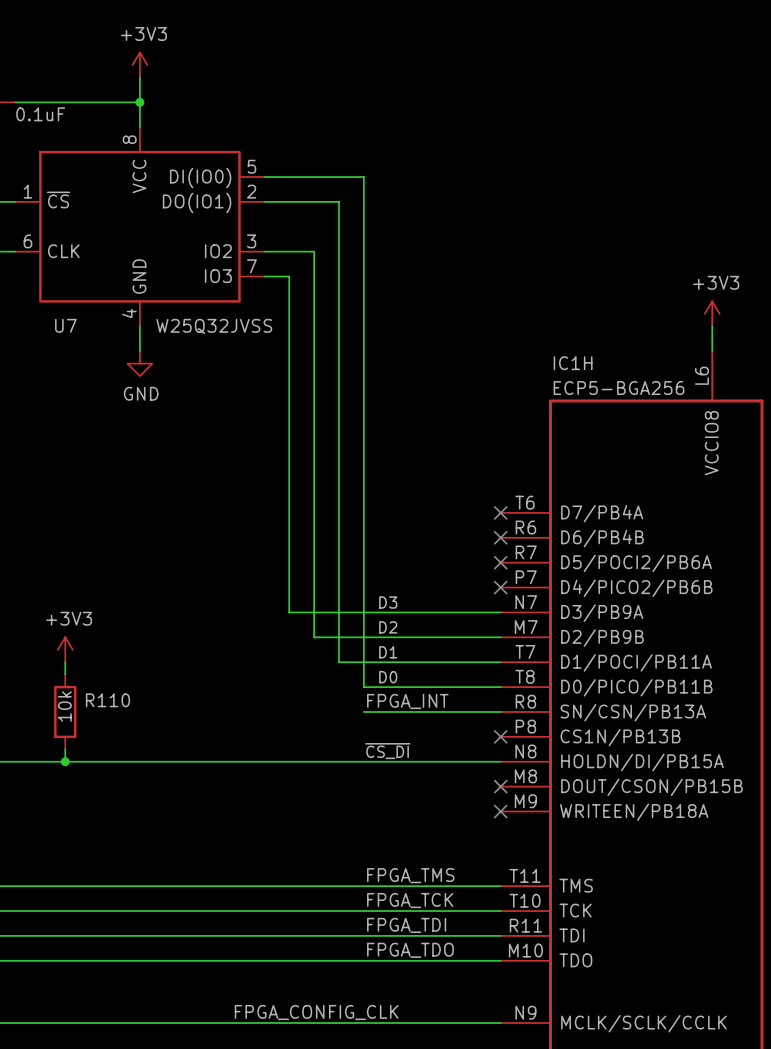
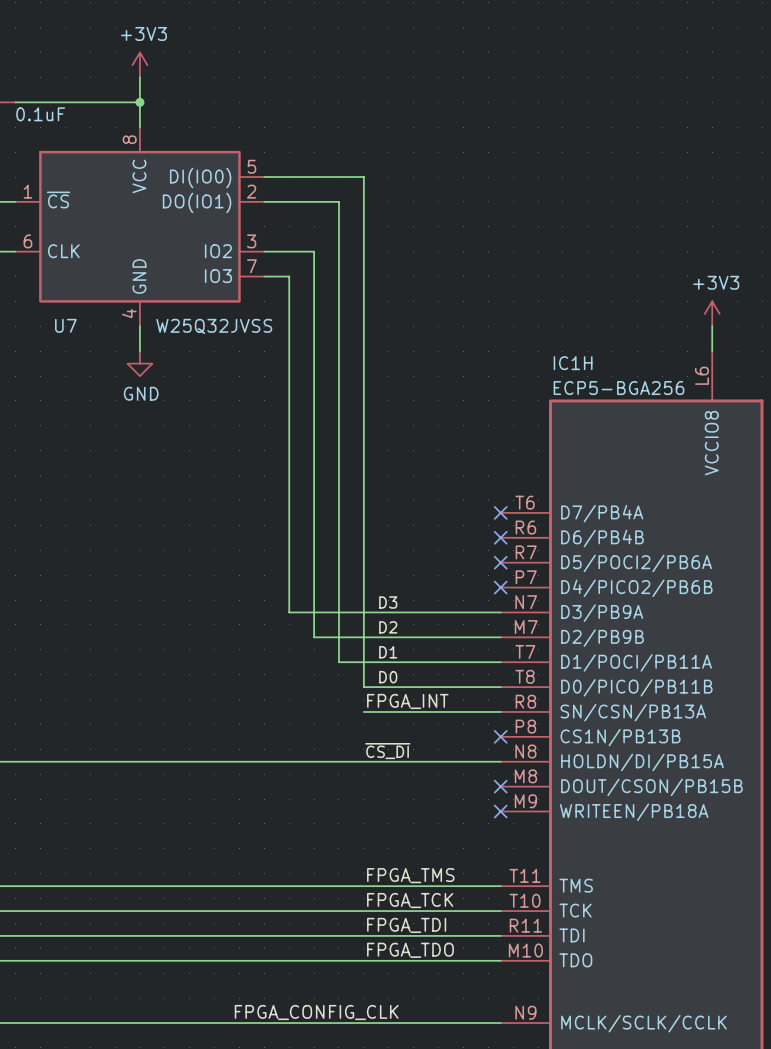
power symbol: +3V3 (65, 649) -> none
wire: (65, 662) (65, 674) -> none
R110: 10k (65, 711) -> none
wire: (65, 749) (65, 761) -> none
junction: (65, 761) -> none

